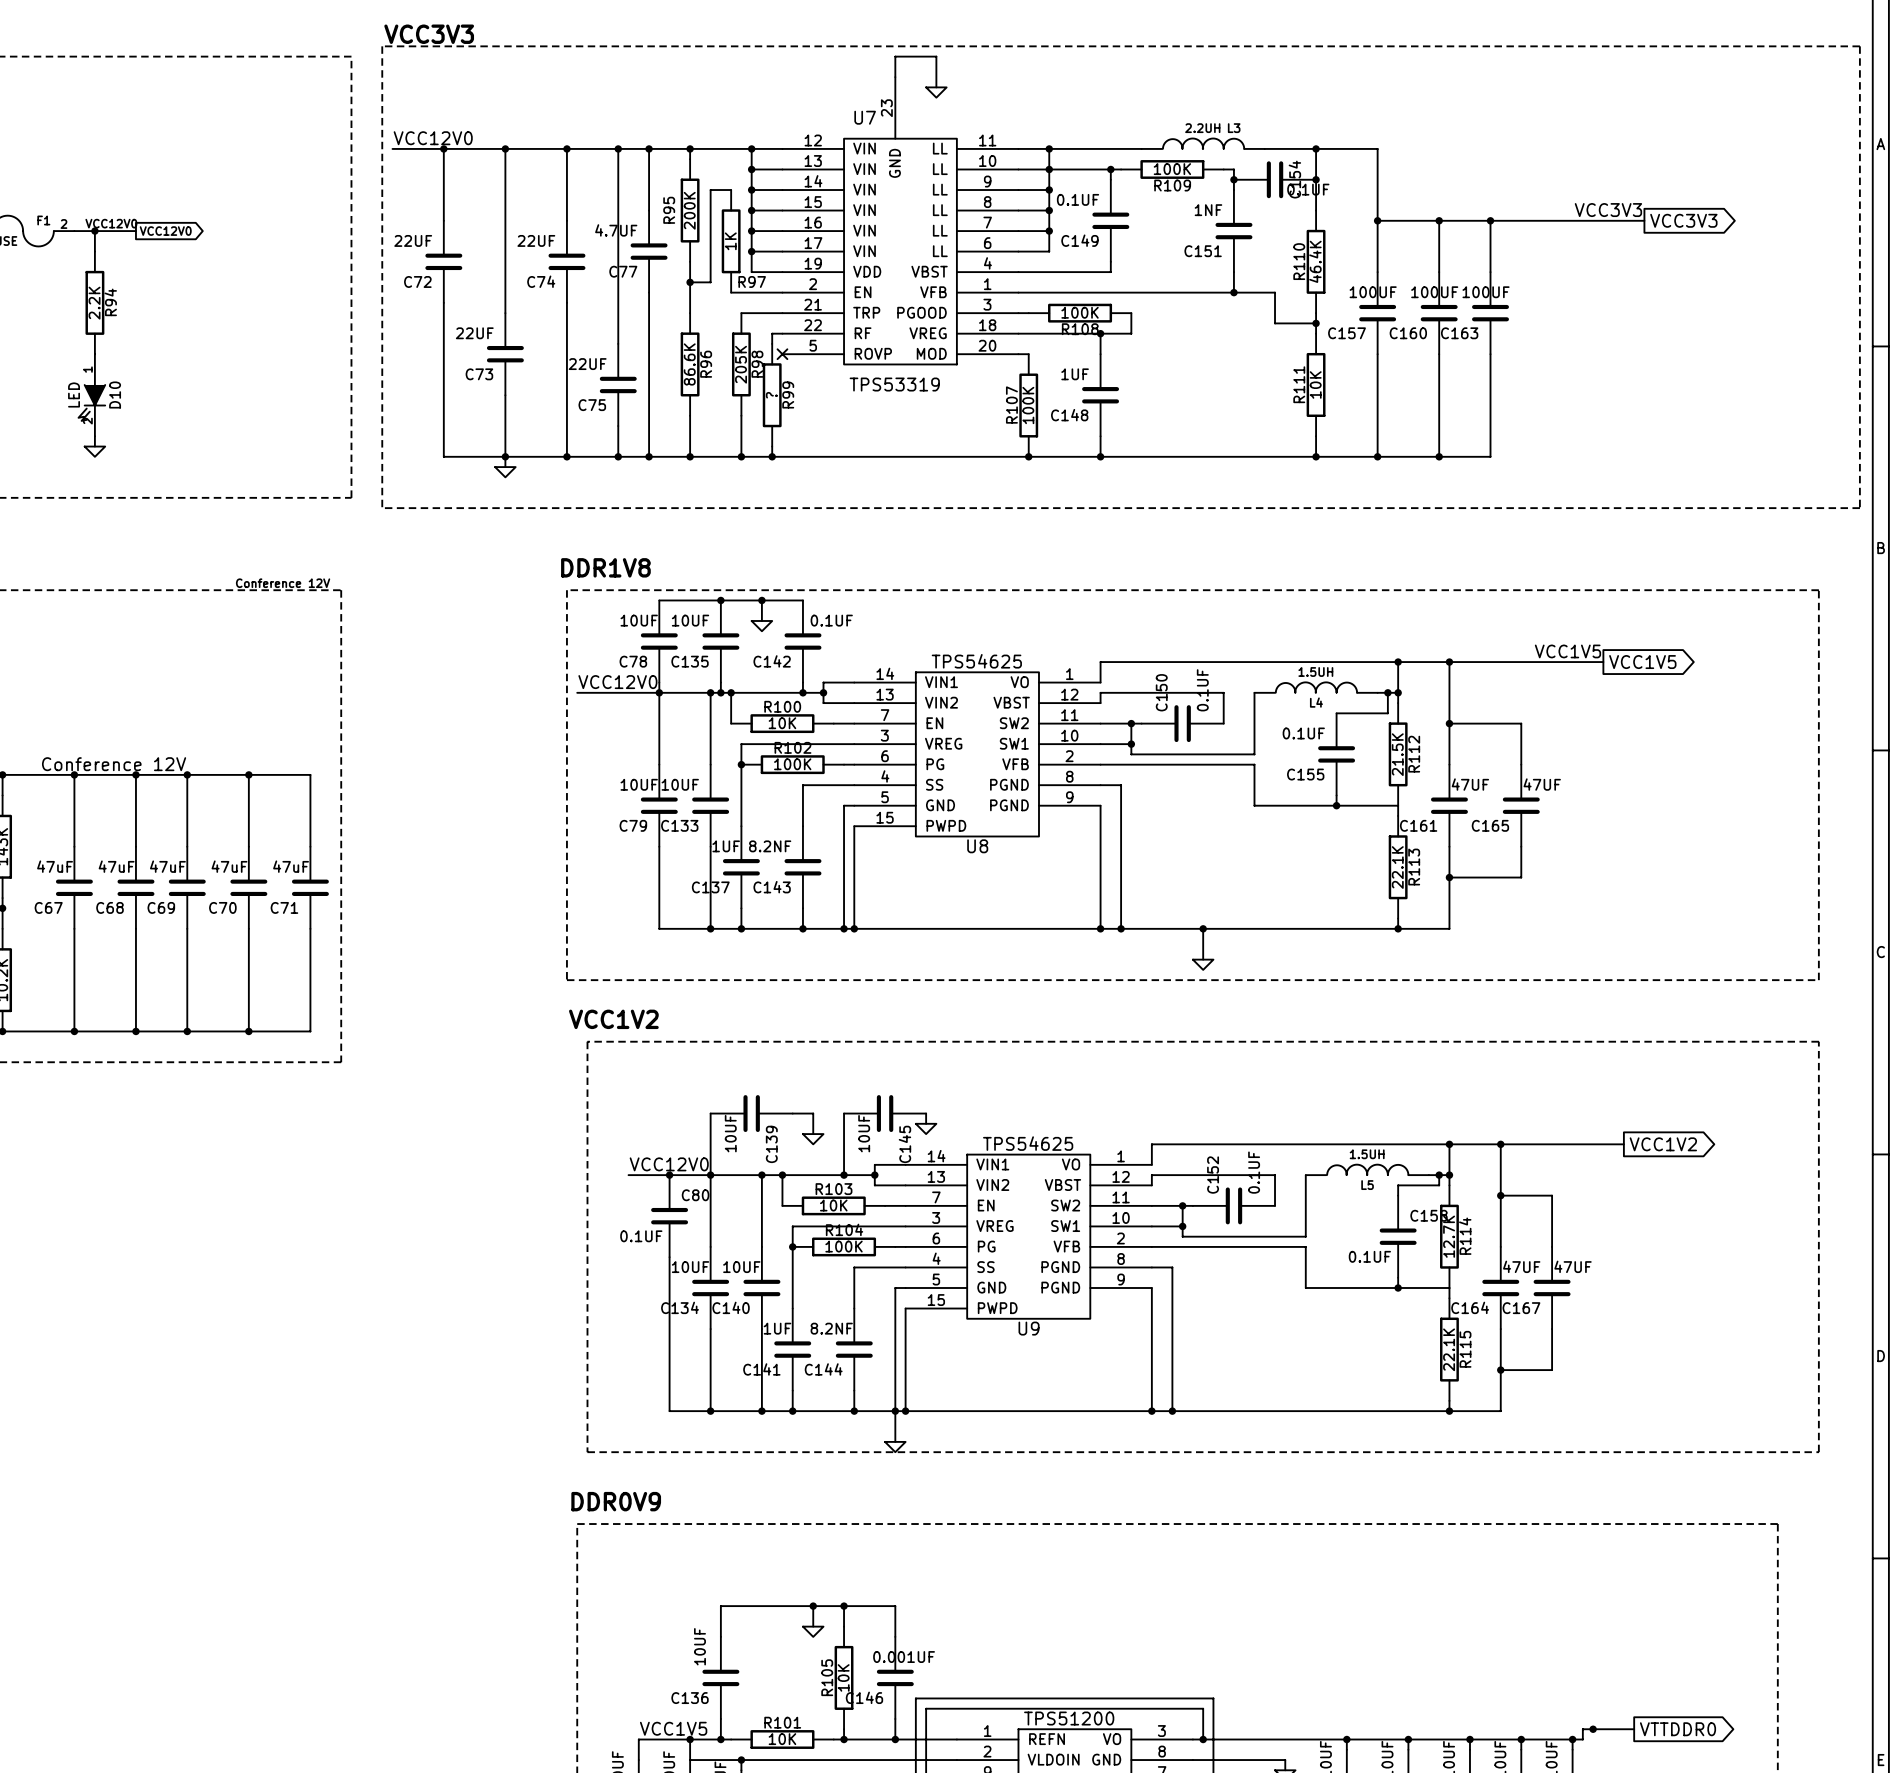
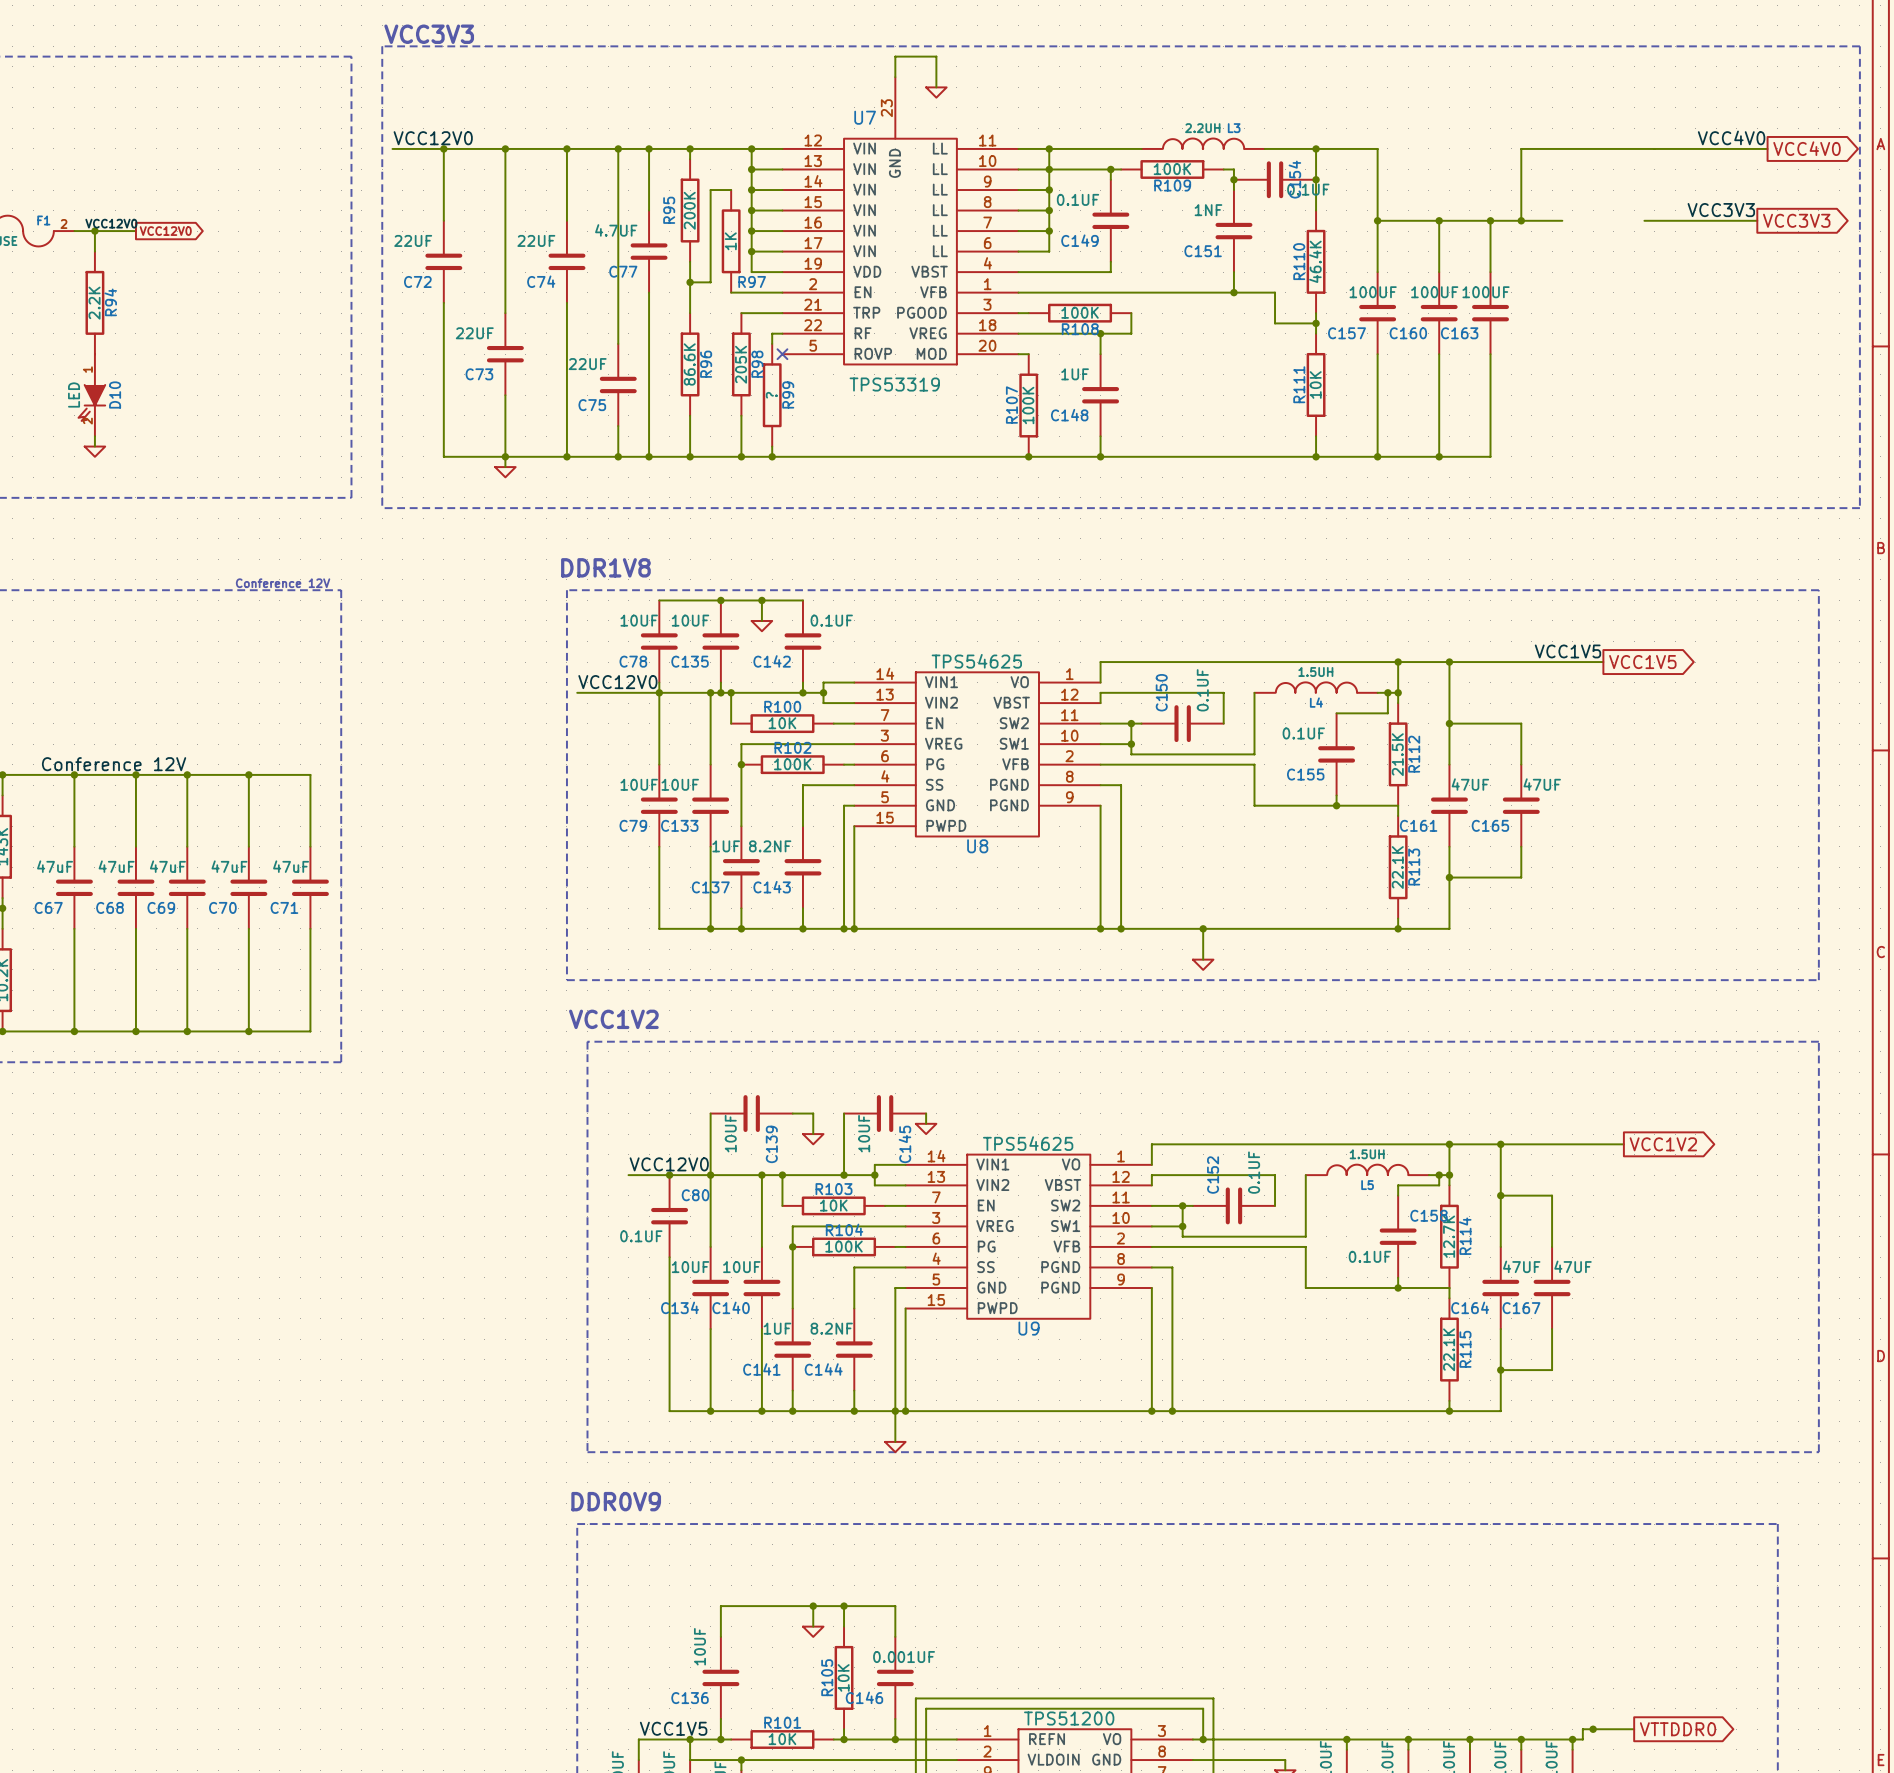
label: none -> VCC4V0 (1731, 137)
wire: none -> (1767, 148) (1521, 148) (1521, 220)
global label: none -> VCC4V0 (1807, 148)
label position: VCC3V3 (1608, 210) -> VCC3V3 (1721, 210)
junction: none -> (1521, 220)
wire: (1562, 220) (1644, 220) -> (1757, 220) (1644, 220)
global label position: VCC3V3 (1683, 220) -> VCC3V3 (1796, 220)

